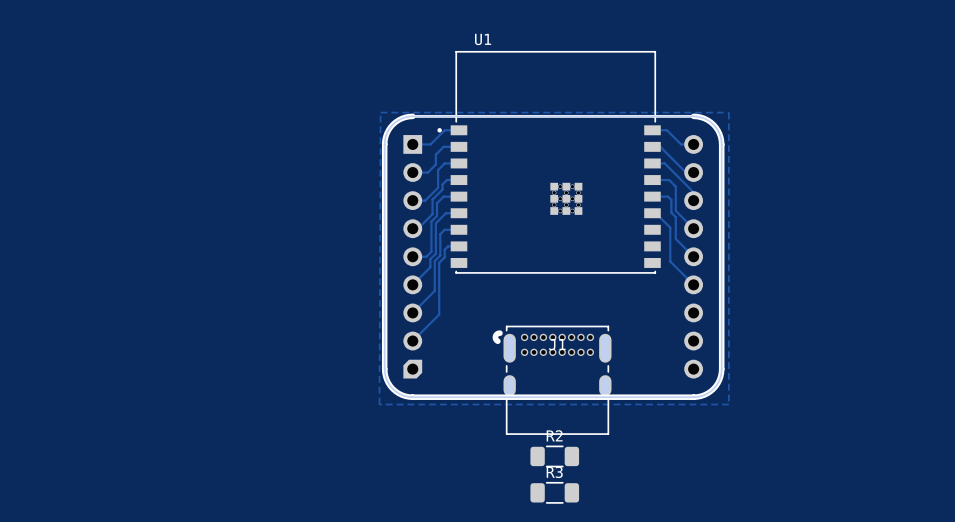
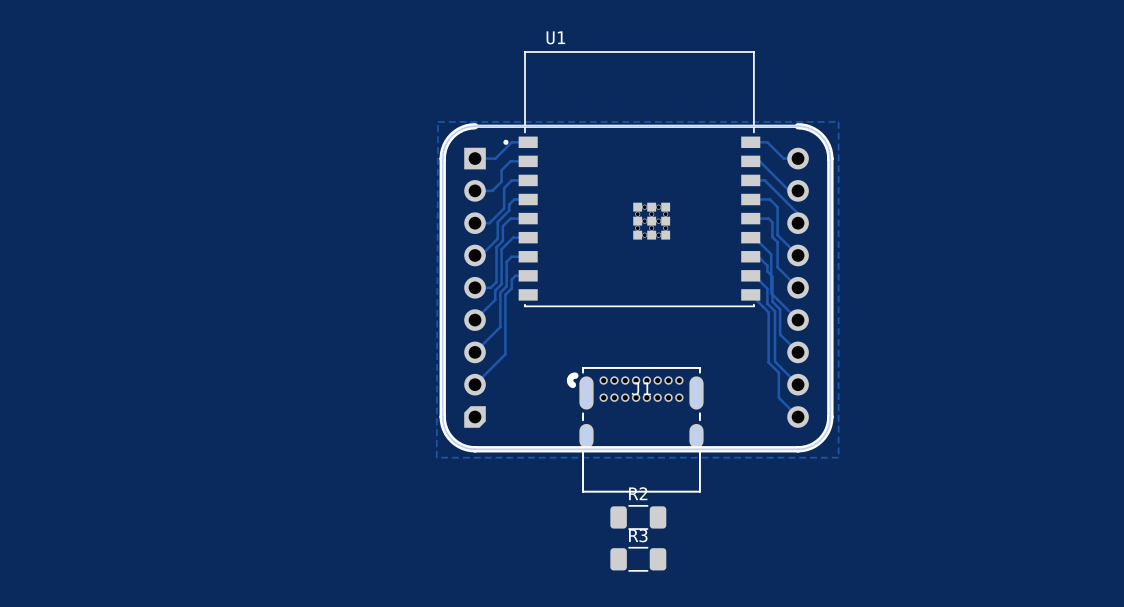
track: none -> (750, 256) (758, 256) (767, 265) (767, 271) (772, 276) (772, 301) (780, 309) (780, 334) (798, 352)
track: none -> (750, 275) (754, 275) (767, 288) (767, 303) (775, 311) (775, 361) (798, 384)
track: none -> (750, 294) (768, 312) (768, 362) (778, 372) (778, 397) (798, 416)

